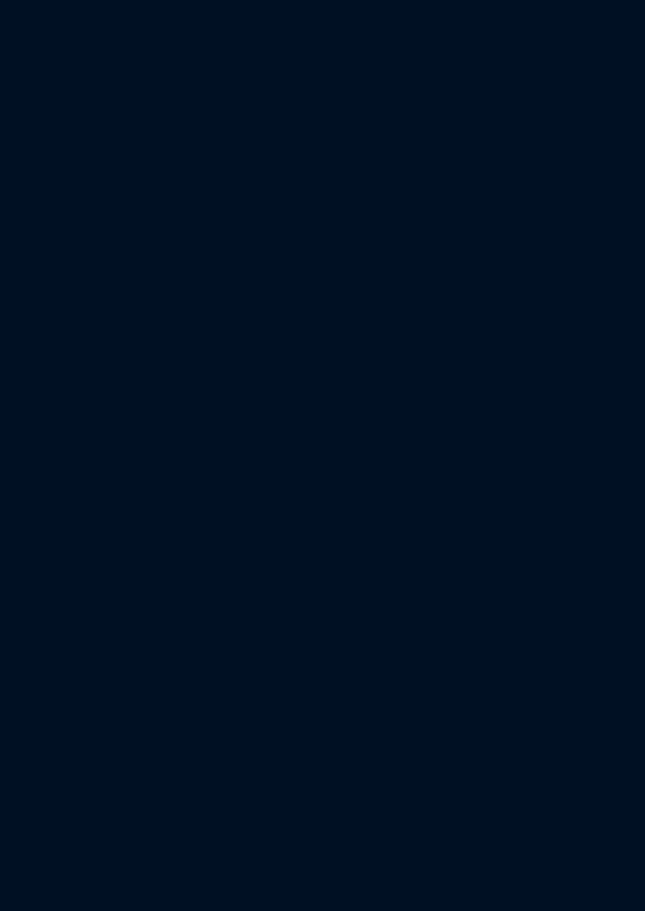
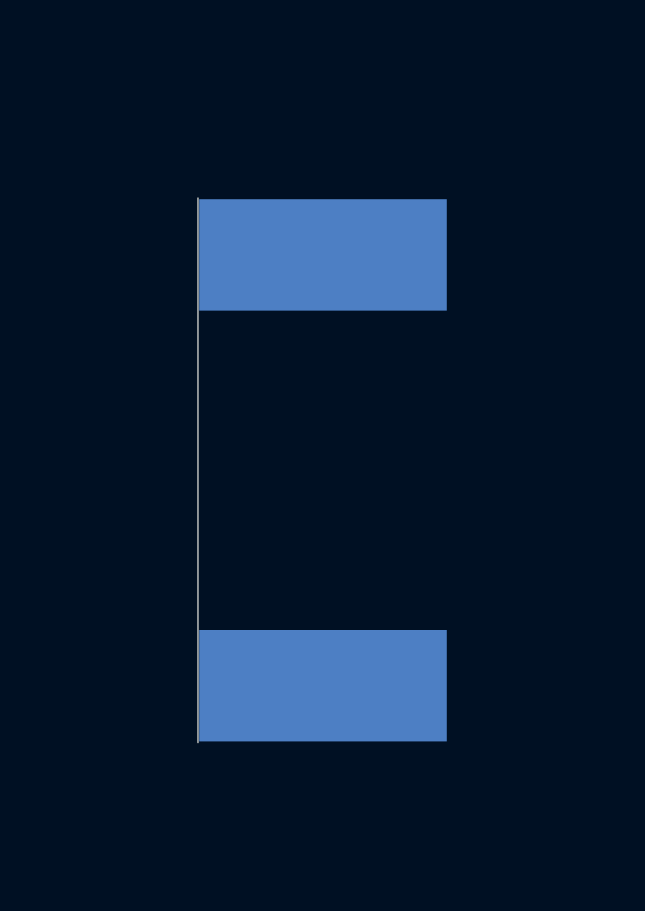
part: none -> (322, 470)

